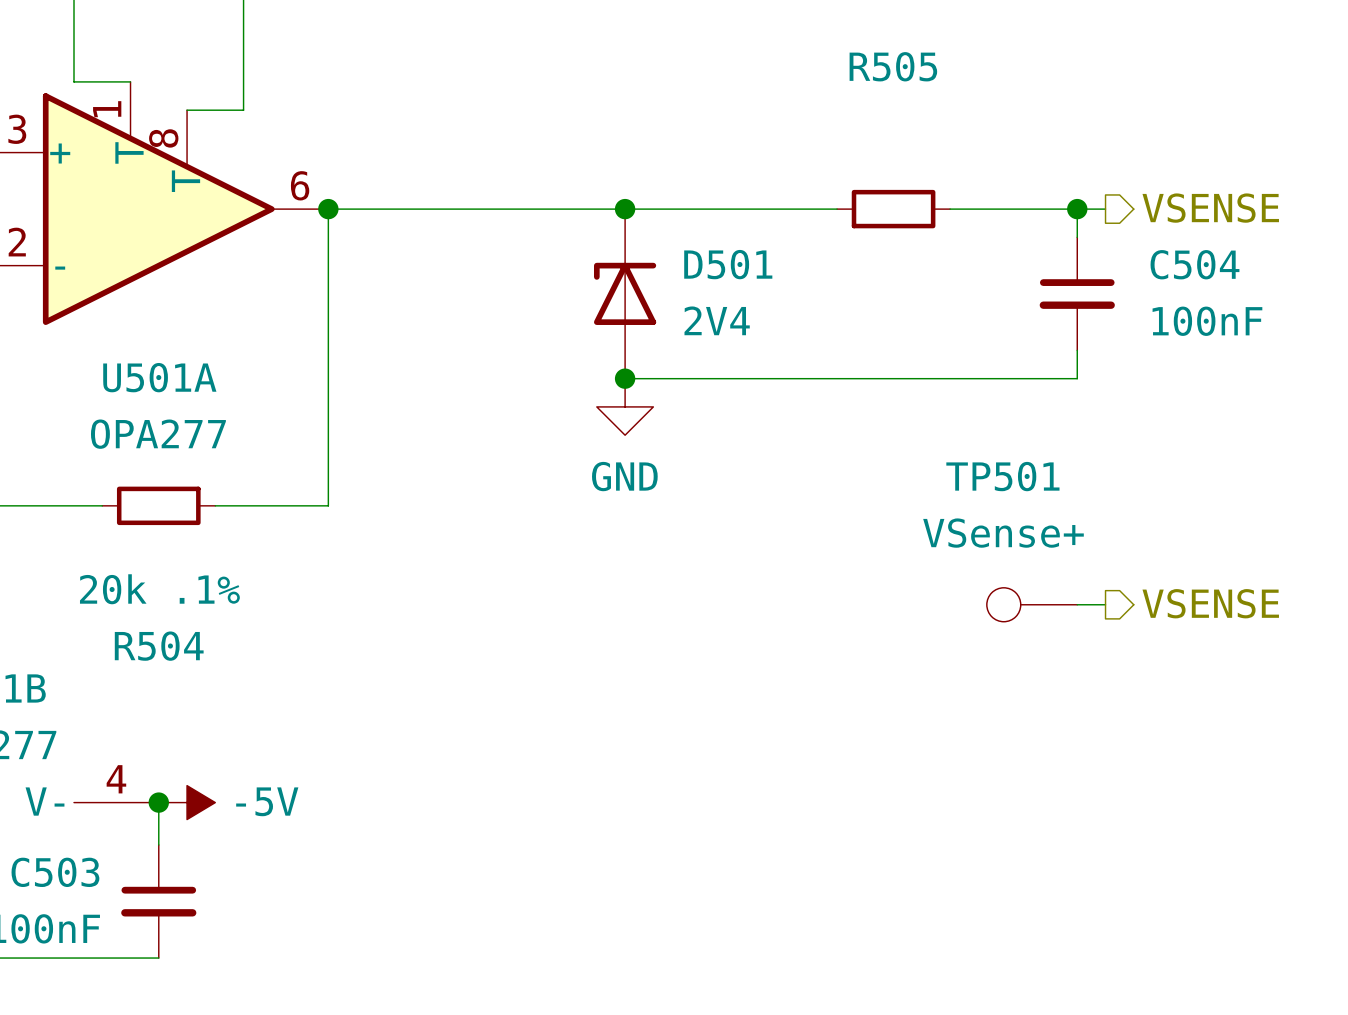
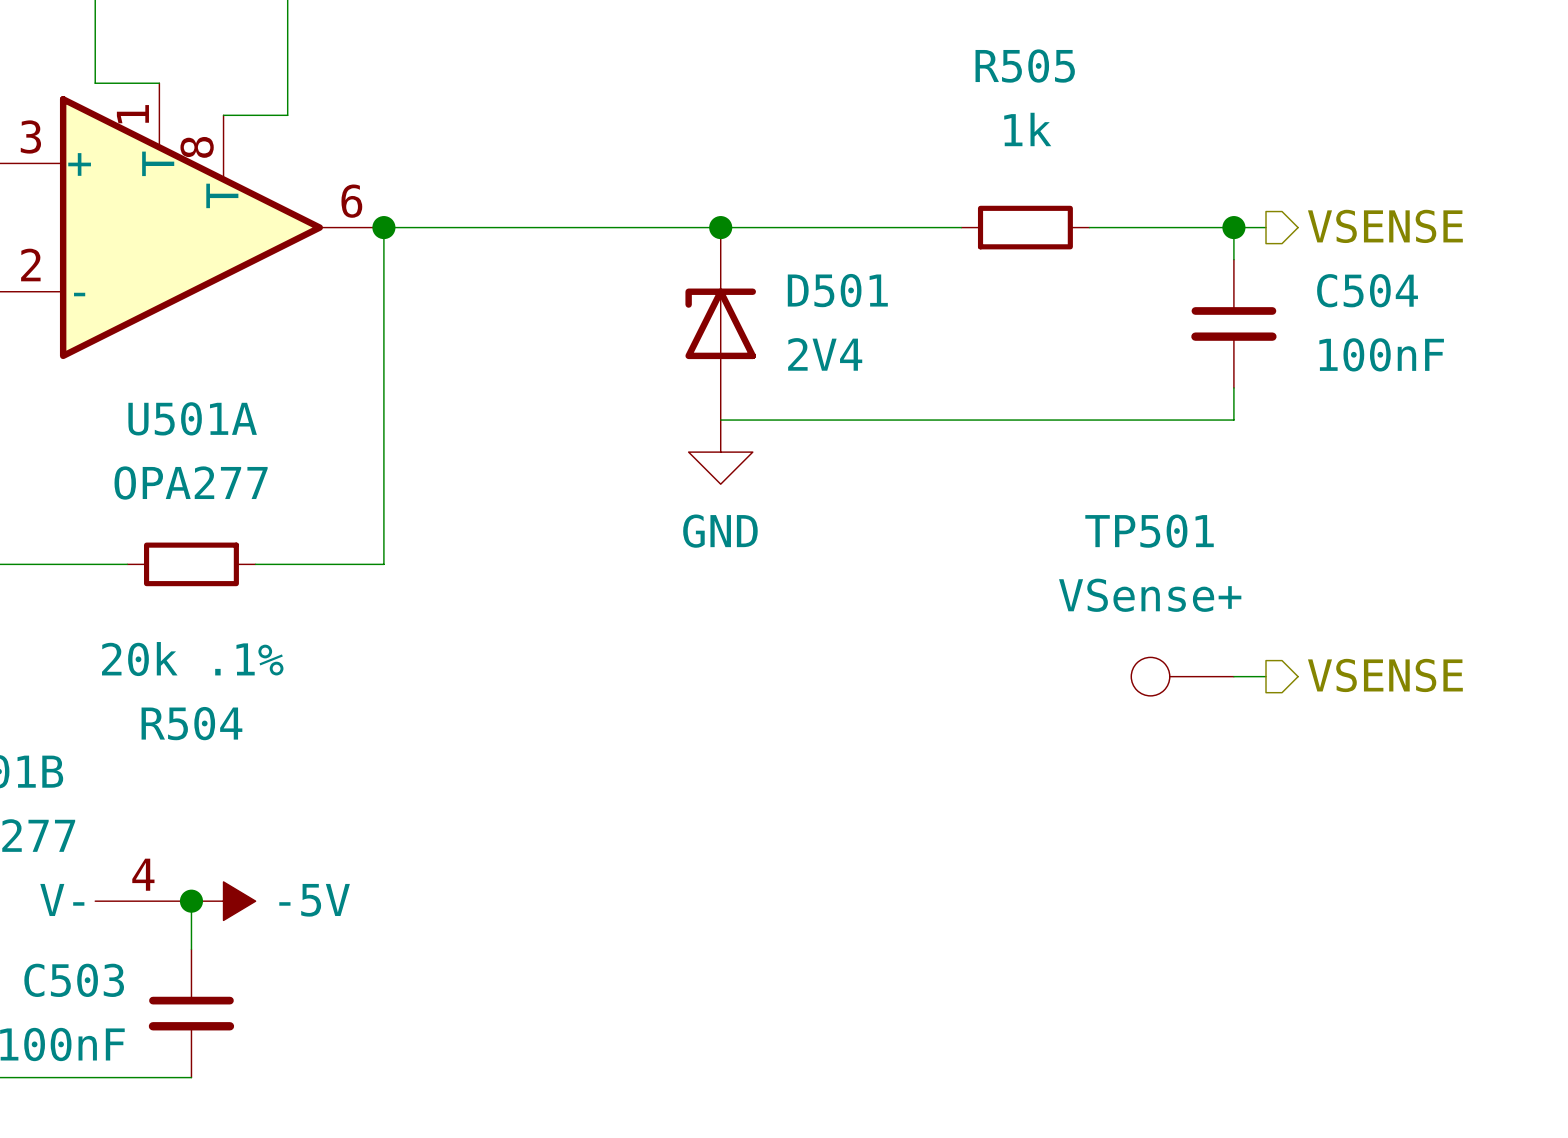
R505 value: none -> 1k (1027, 129)
junction: (625, 378) -> none

